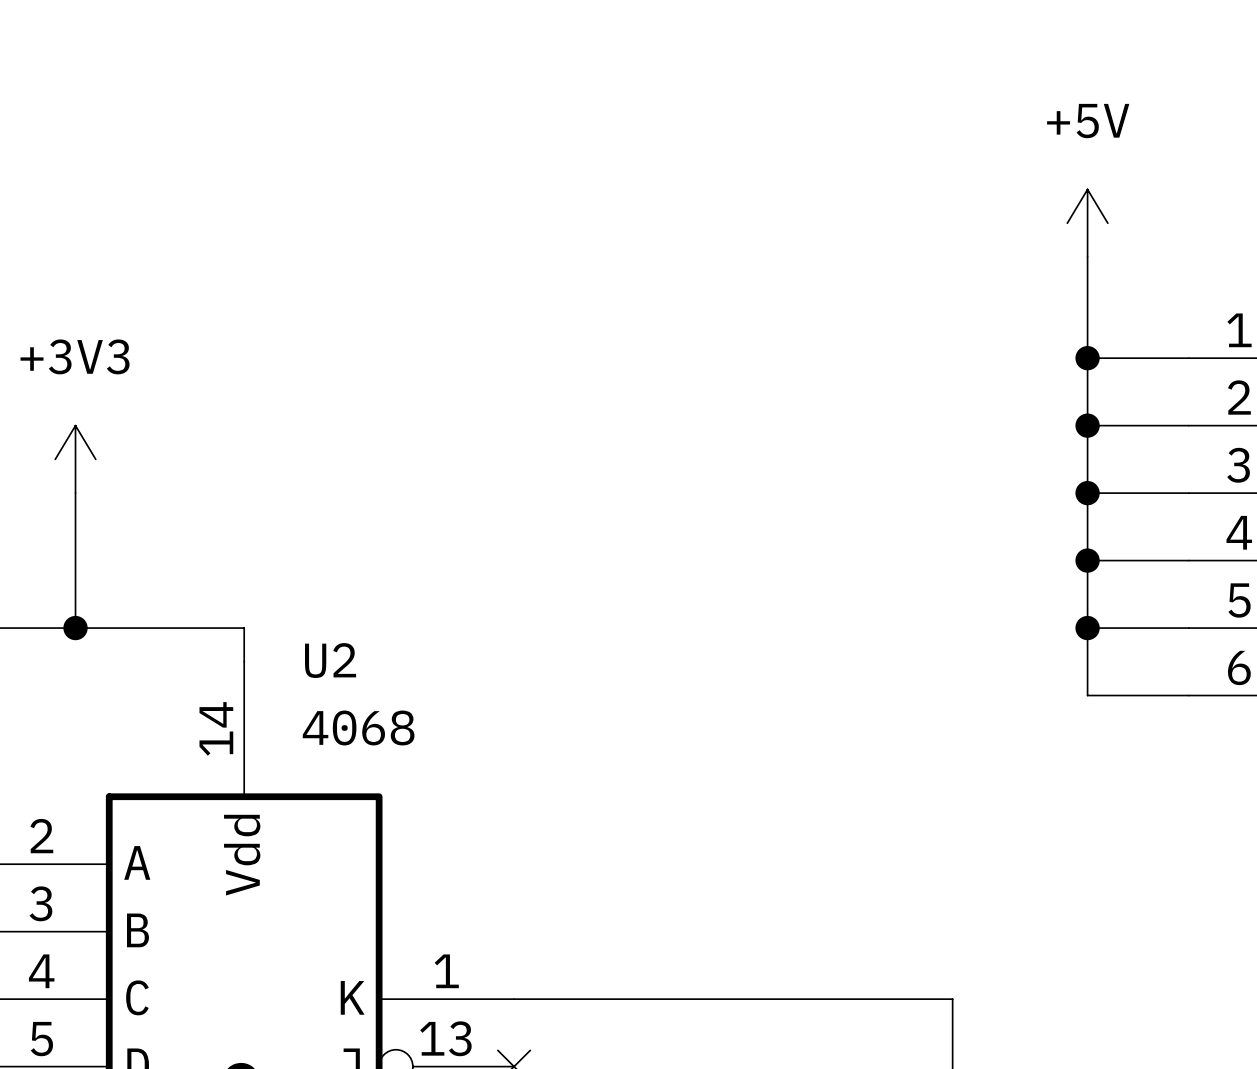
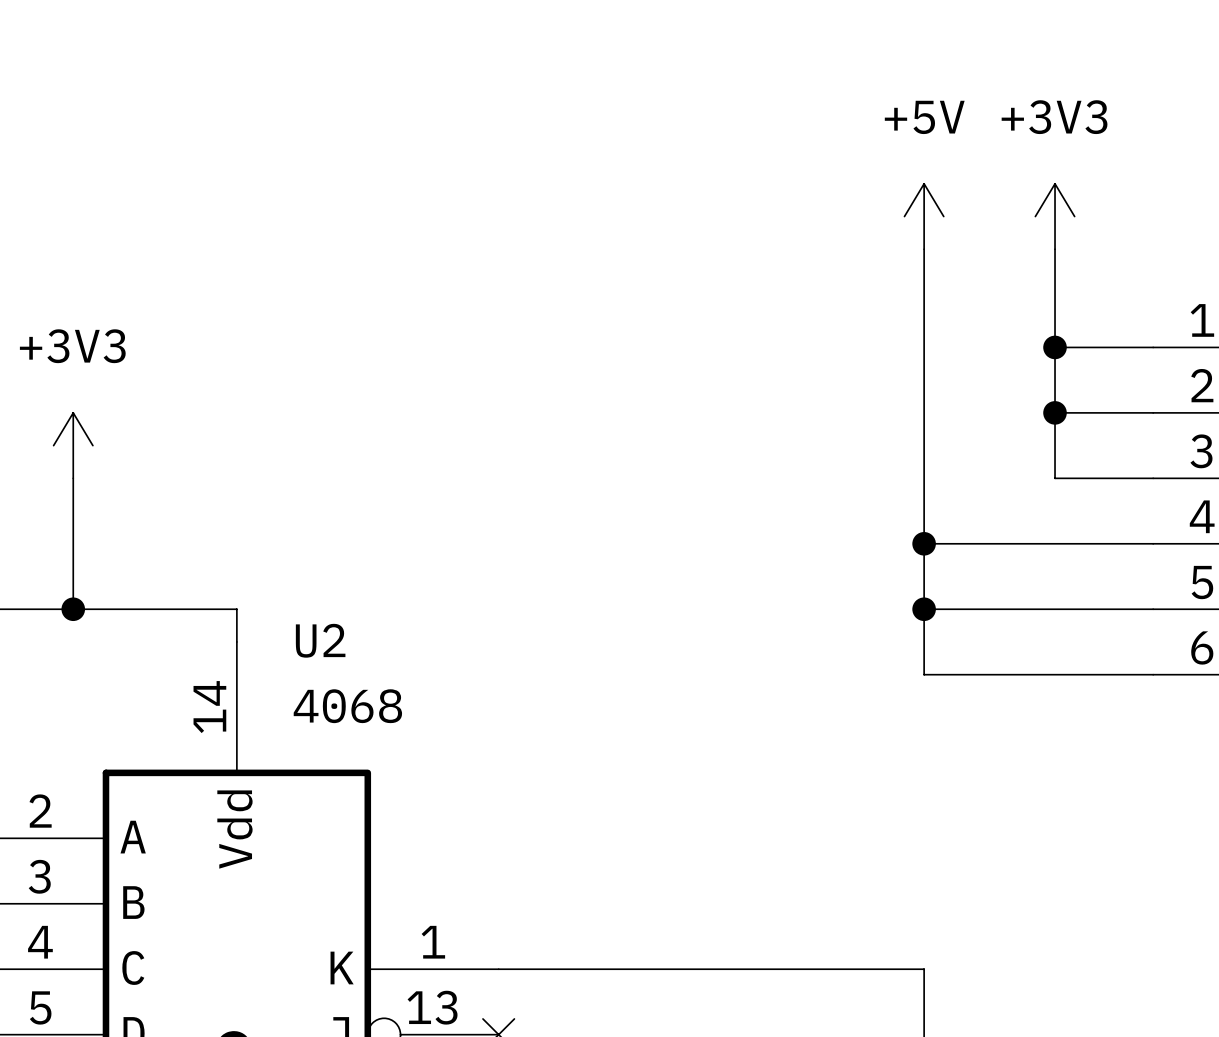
power symbol: none -> +5V (924, 216)
power symbol: +5V (1087, 223) -> +3V3 (1055, 216)
wire: (1087, 493) (1087, 695) -> (924, 249) (924, 674) (1055, 674)
junction: (1087, 493) -> none
wire: none -> (924, 543) (1055, 543)
junction: none -> (924, 543)
junction: (1087, 560) -> none
wire: none -> (924, 609) (1055, 609)
junction: none -> (924, 609)
junction: (1087, 628) -> none

